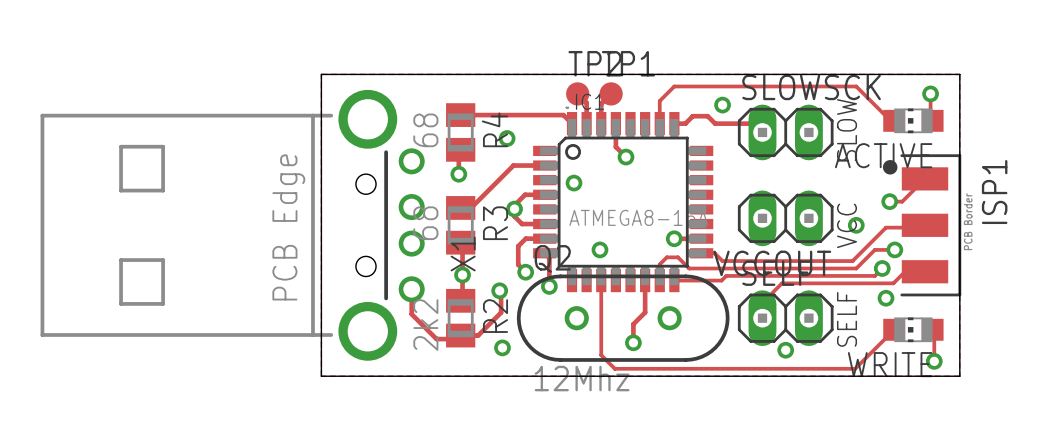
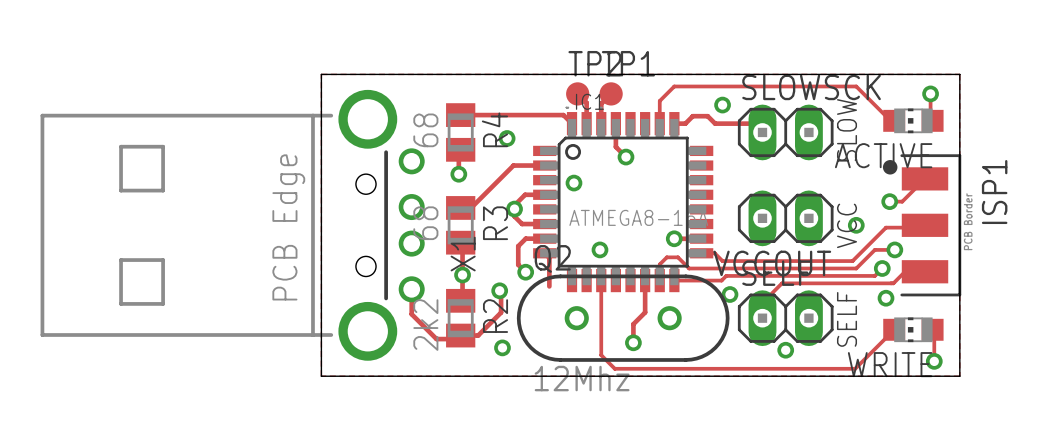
via: (549, 286) -> none
via: none -> (729, 294)

